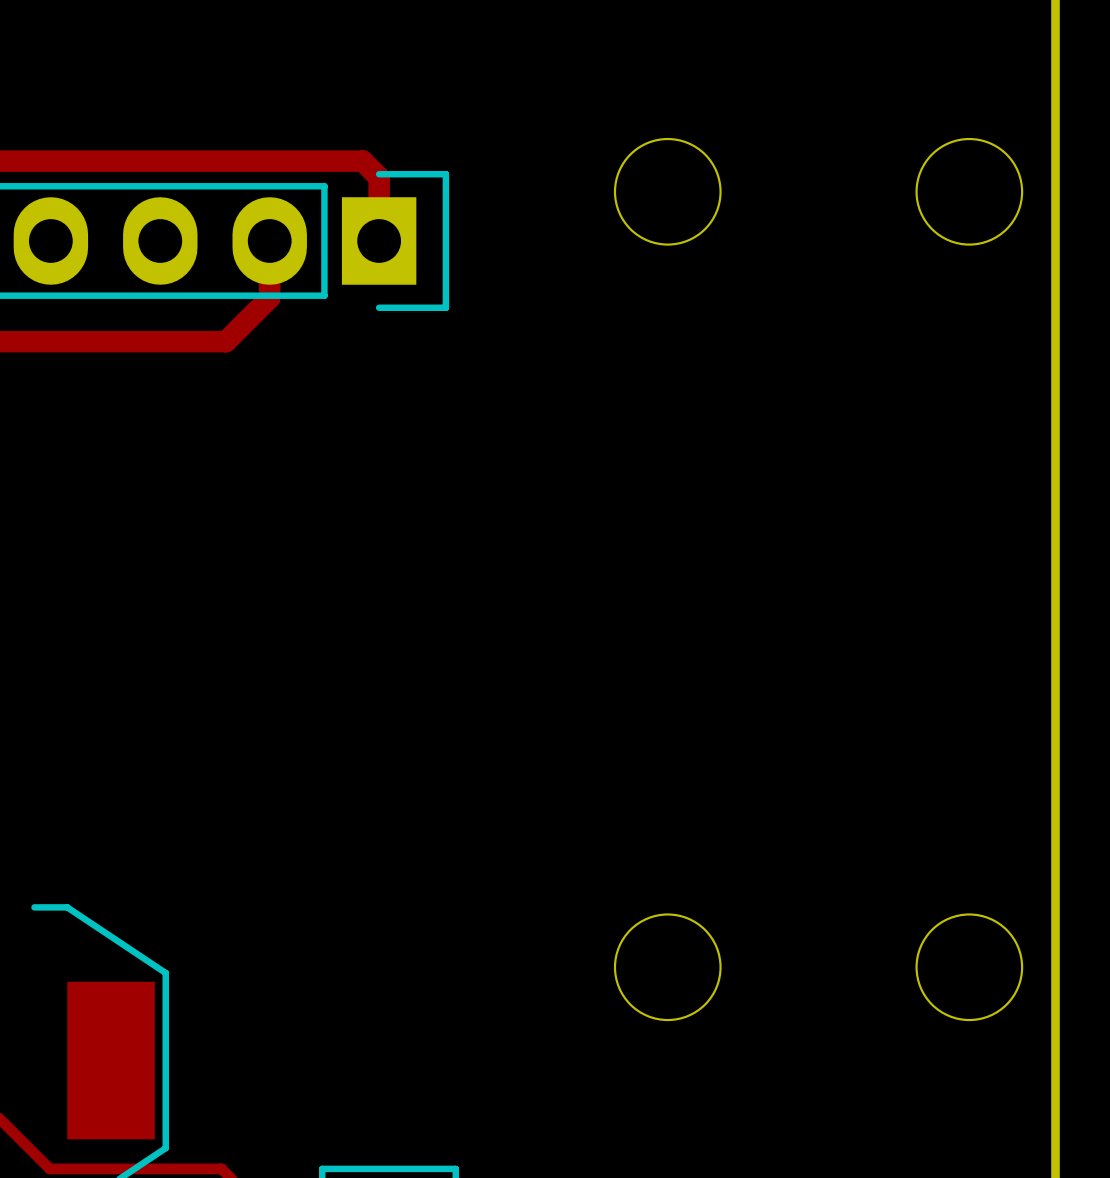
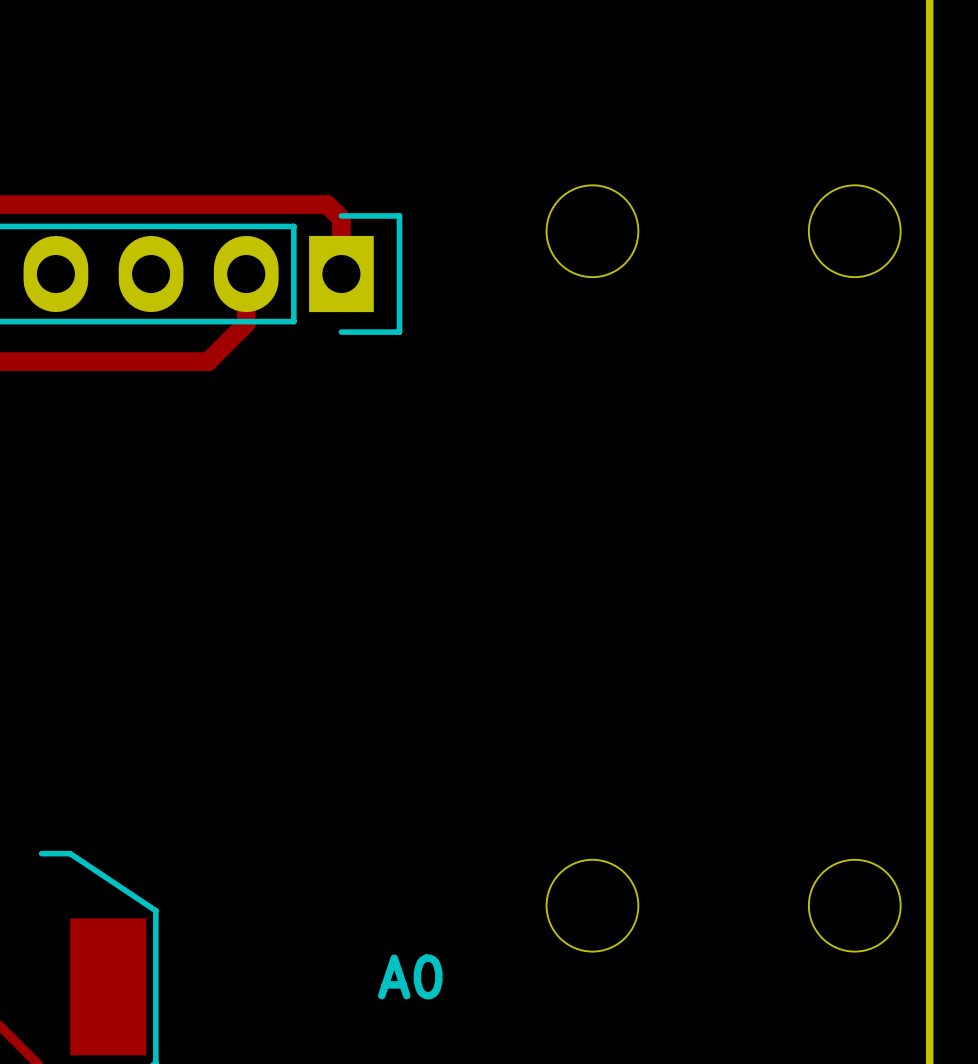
text: none -> A0 (410, 976)

